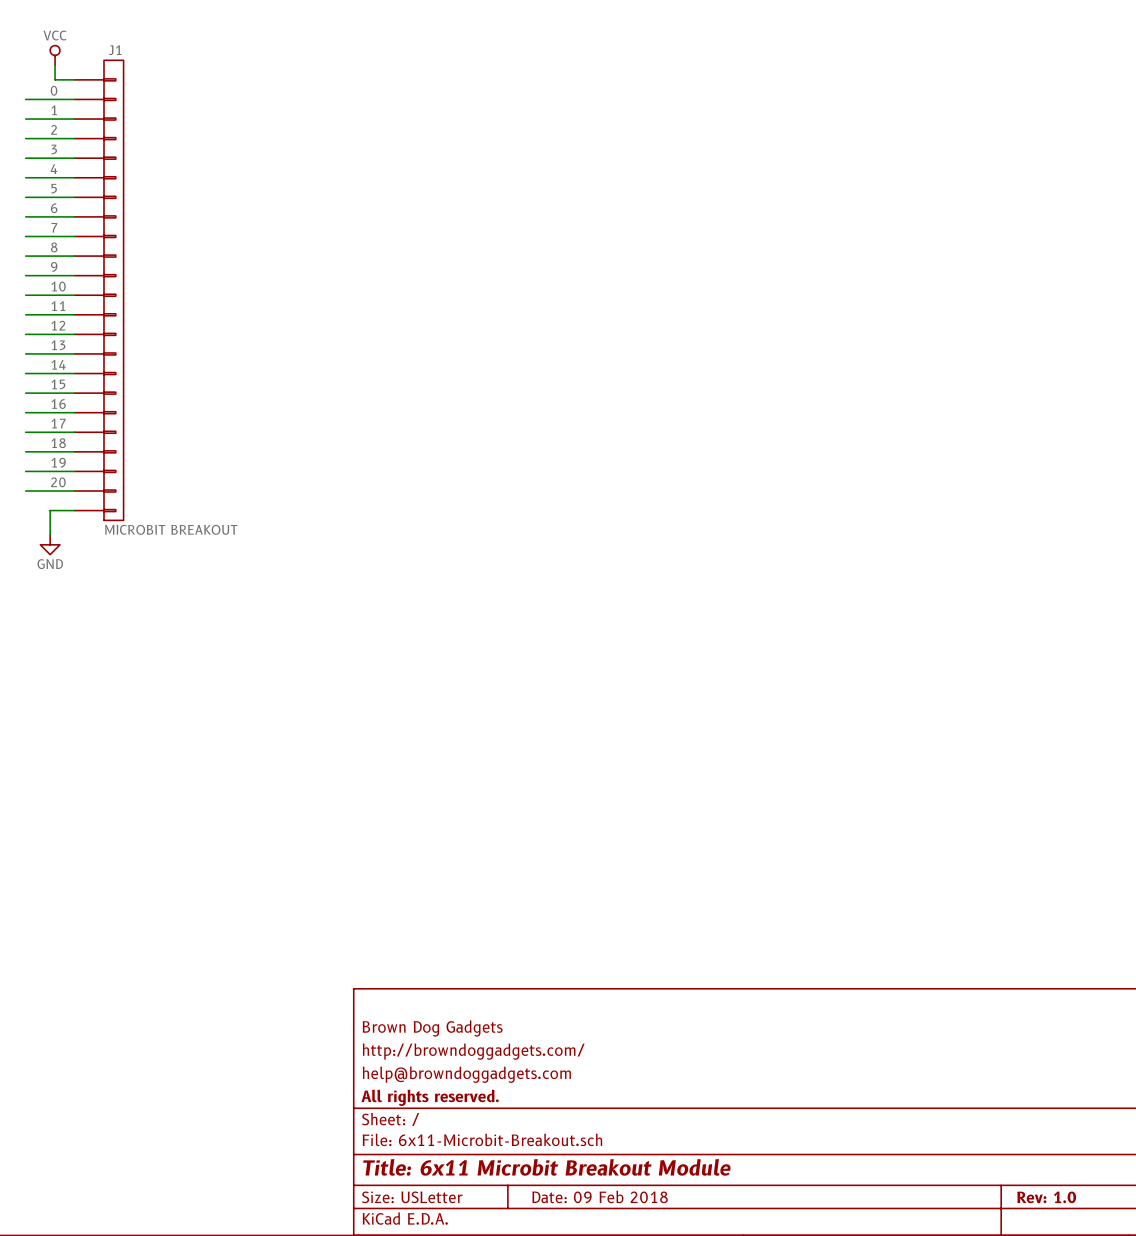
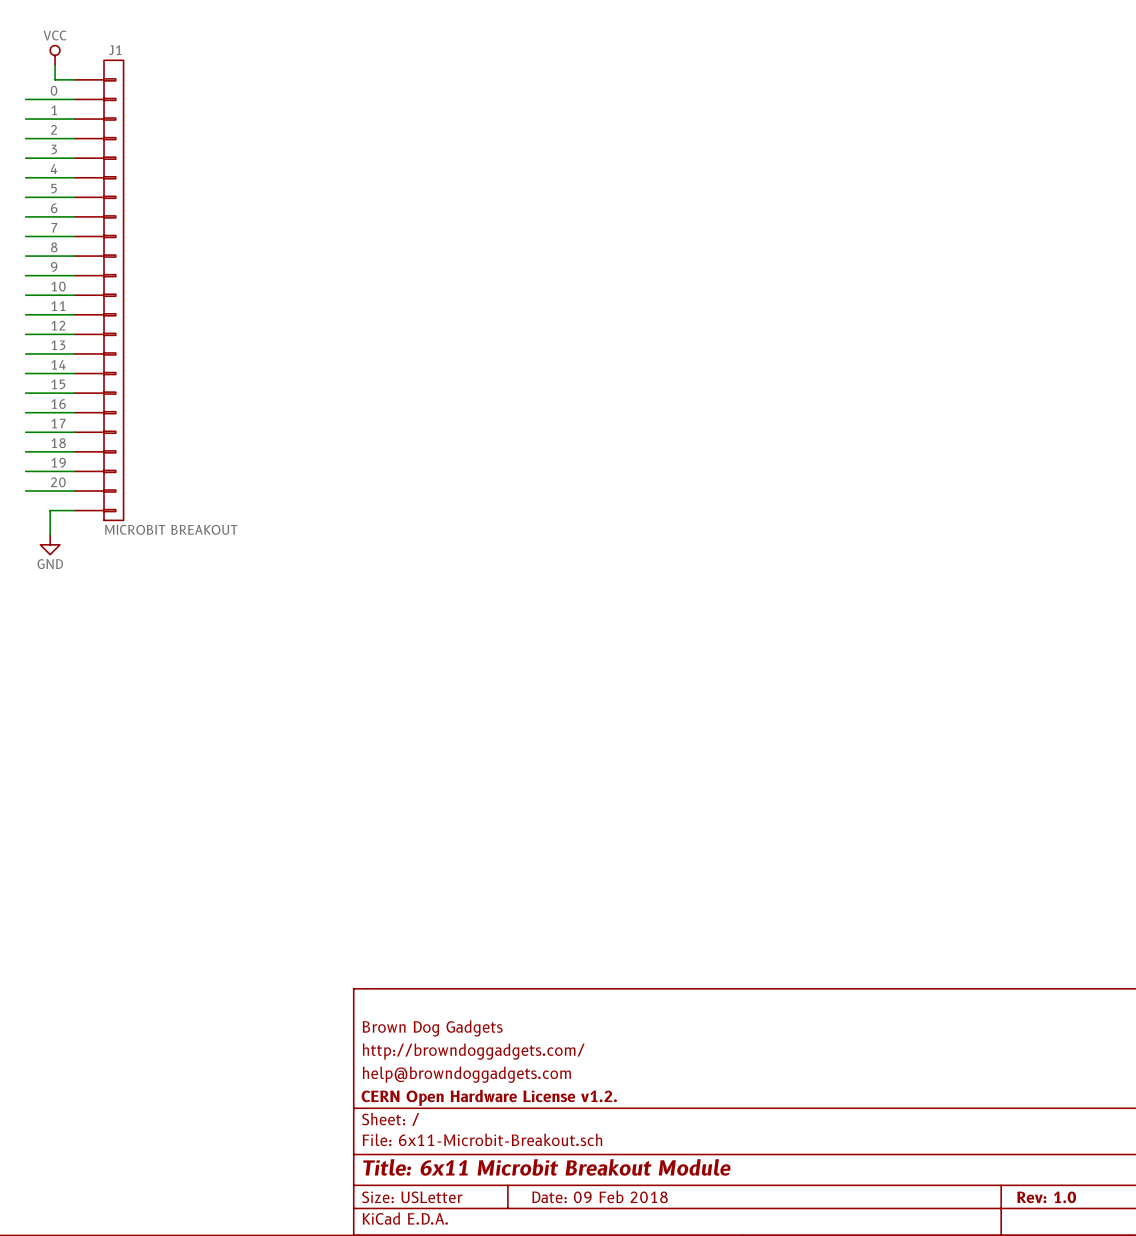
title block: All rights reserved. (430, 1097) -> CERN Open Hardware License v1.2. (489, 1097)

